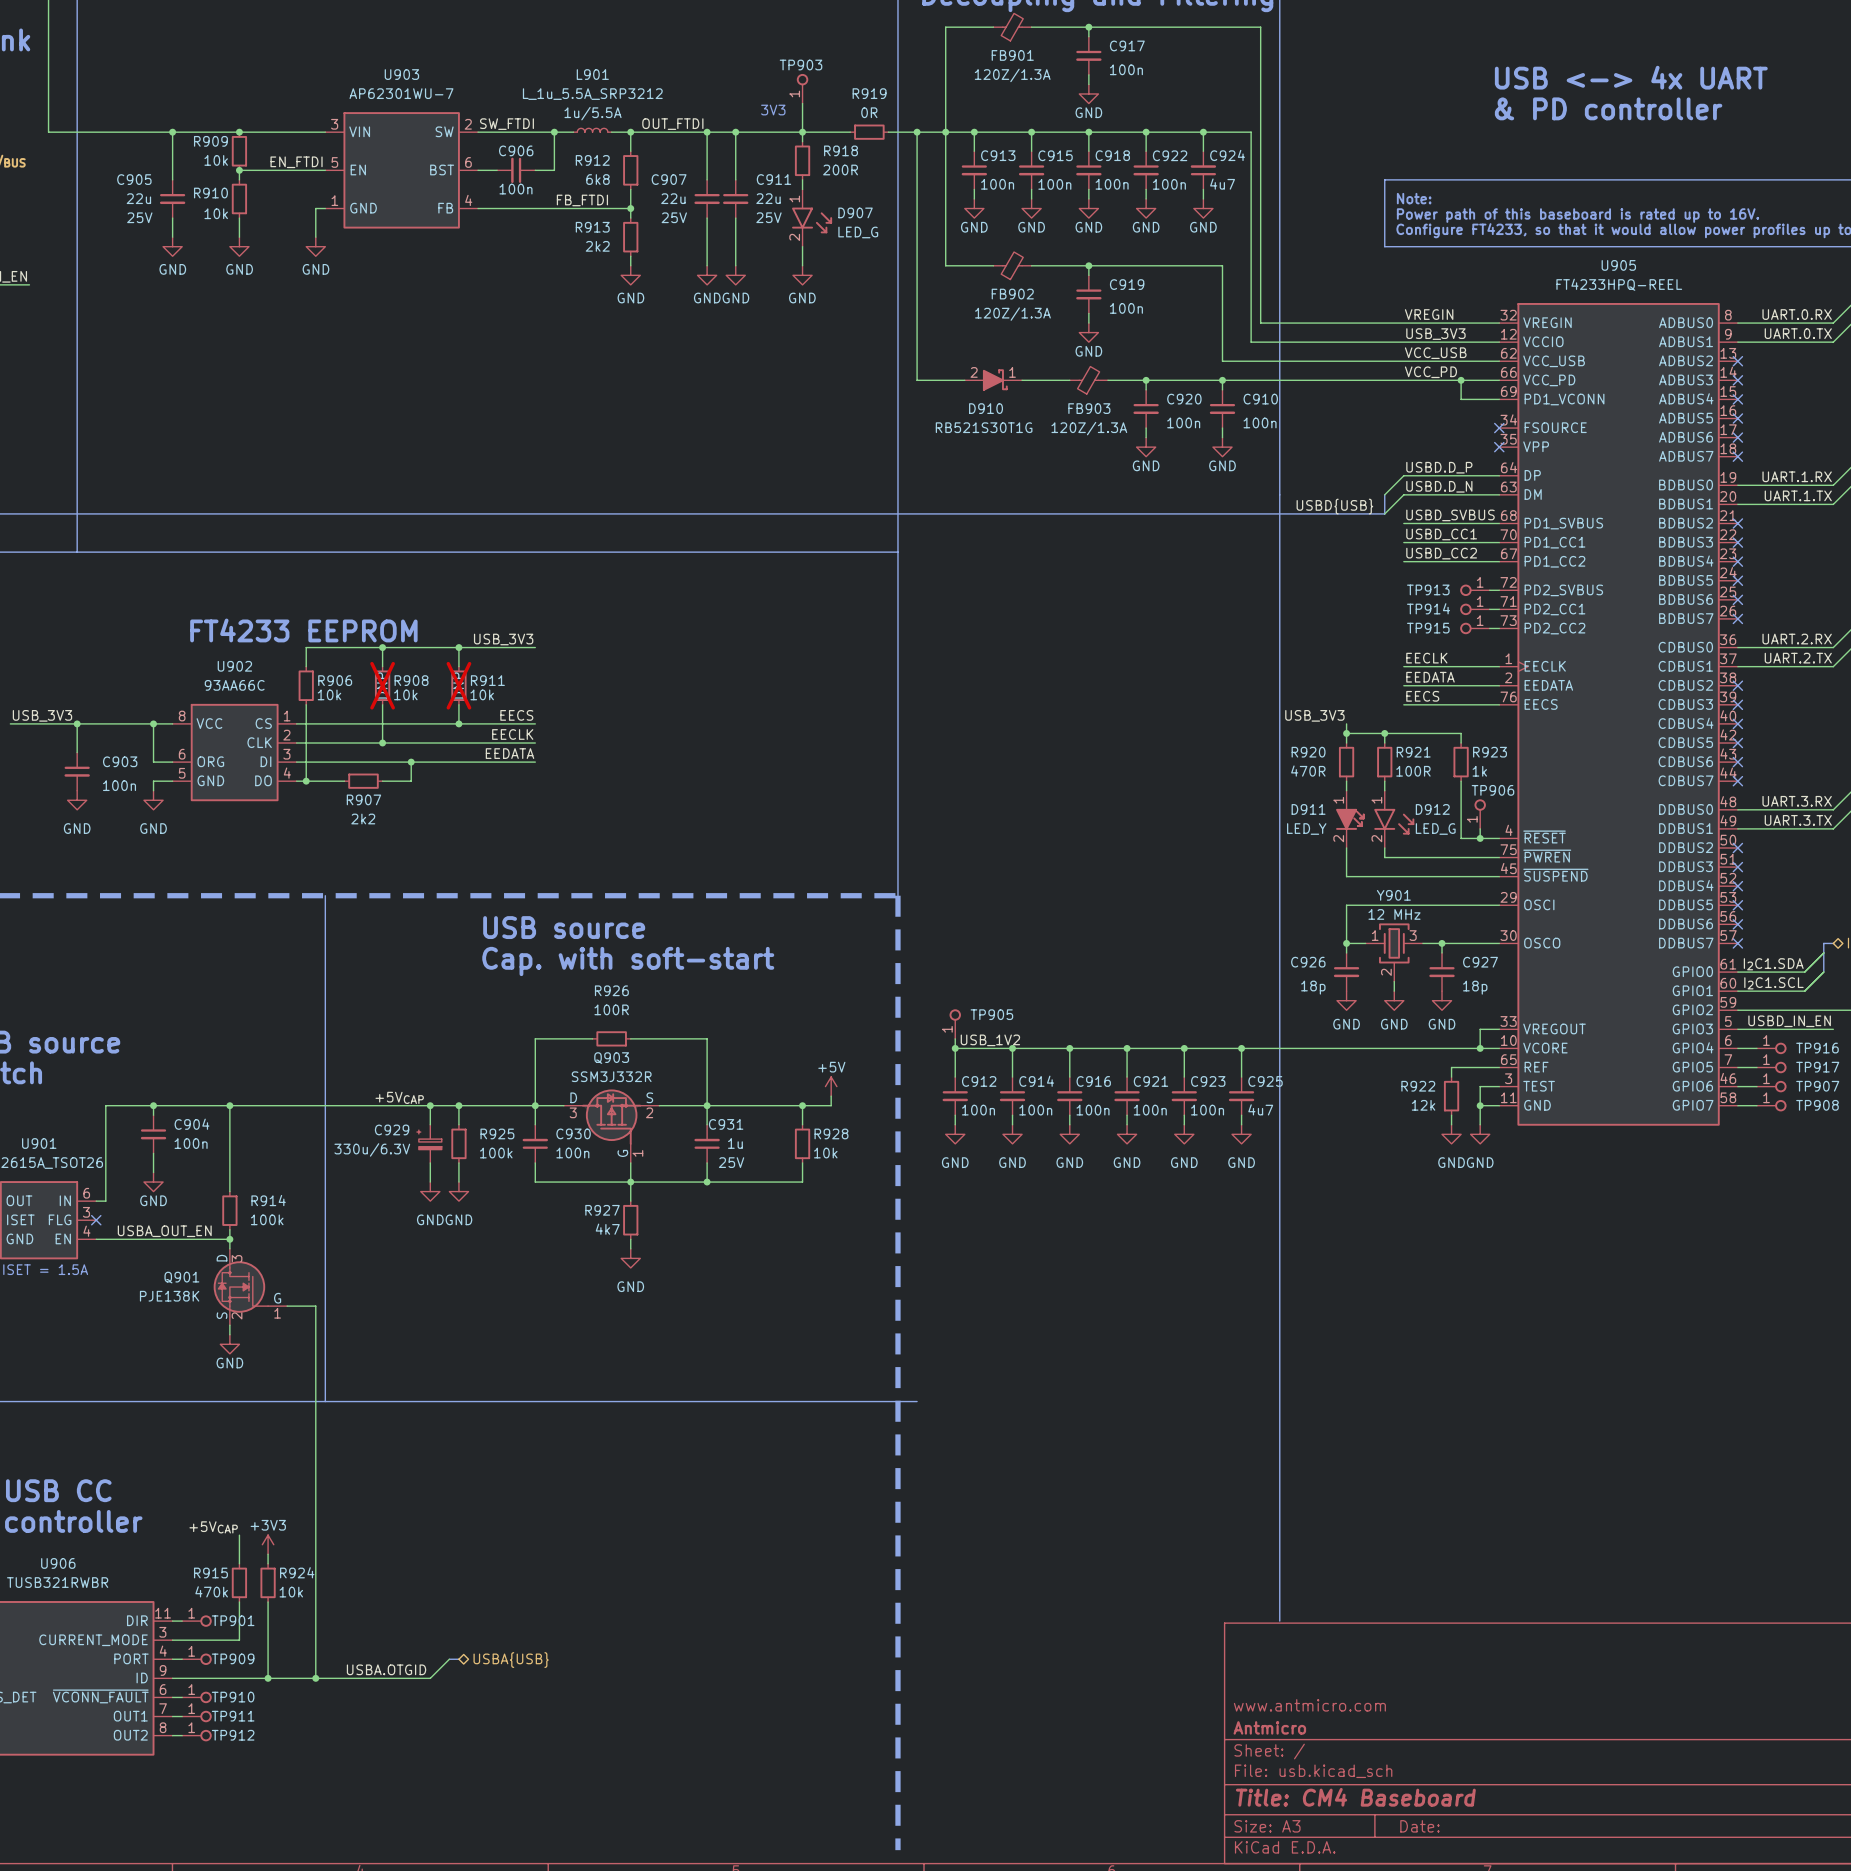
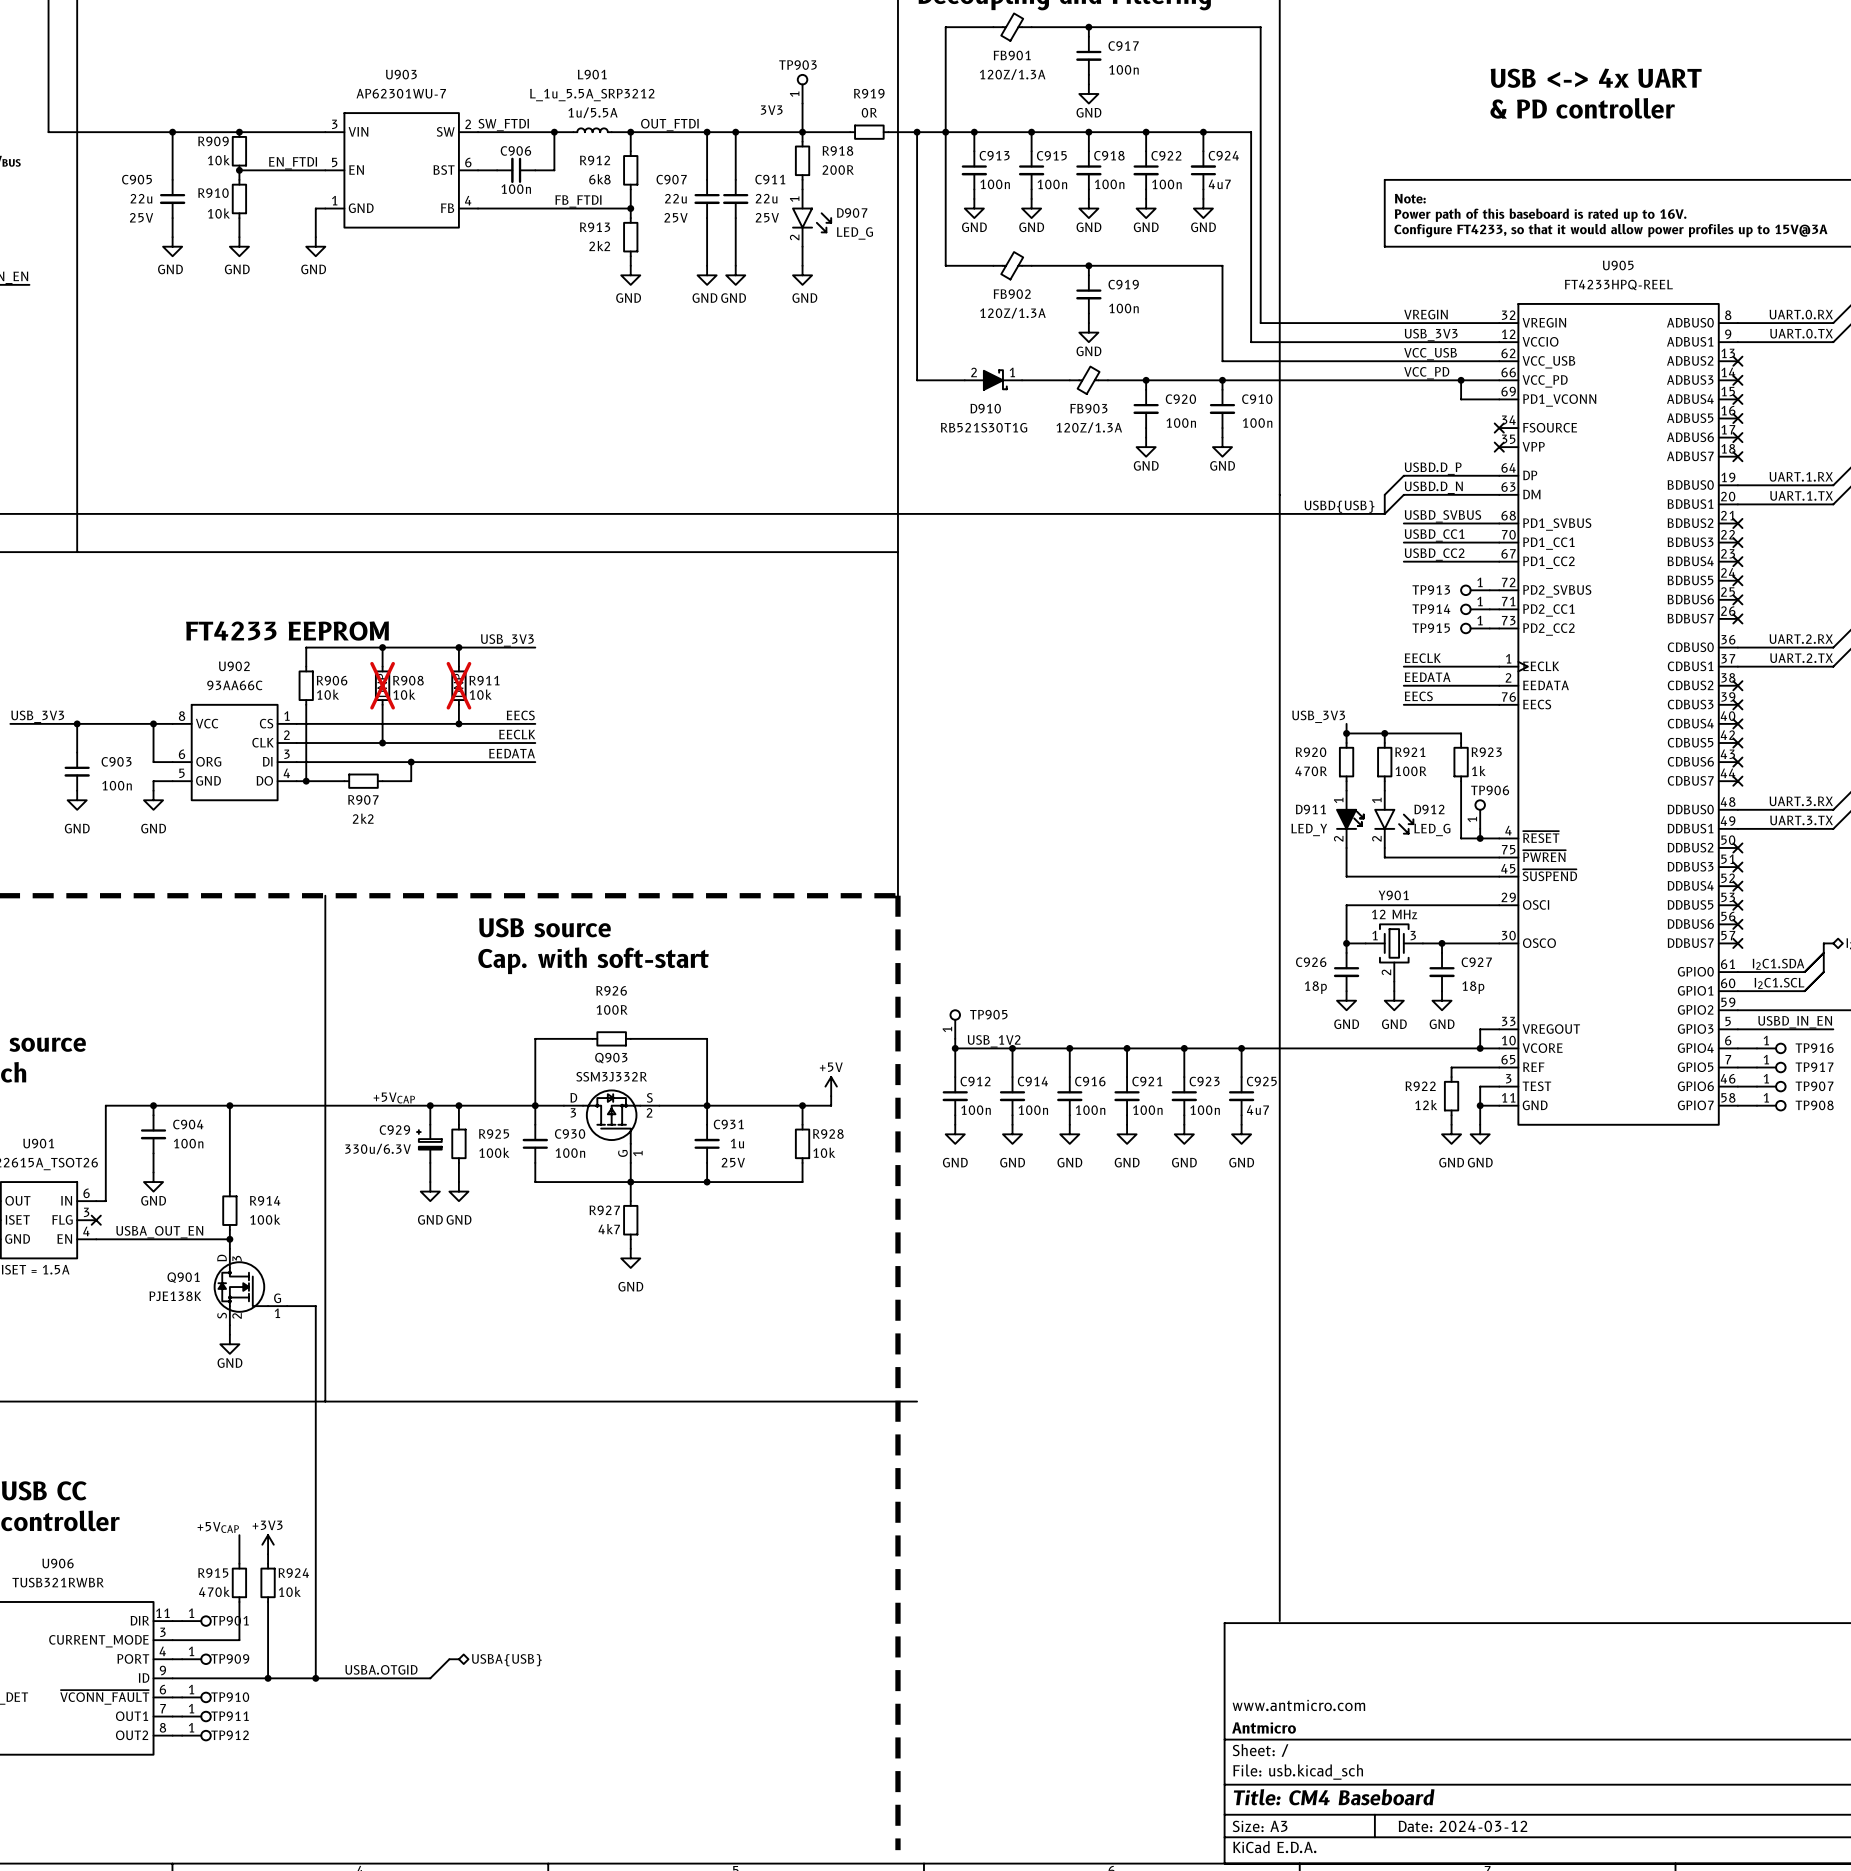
title block: Date: (1419, 1826) -> Date: 2024-03-12 (1462, 1826)

